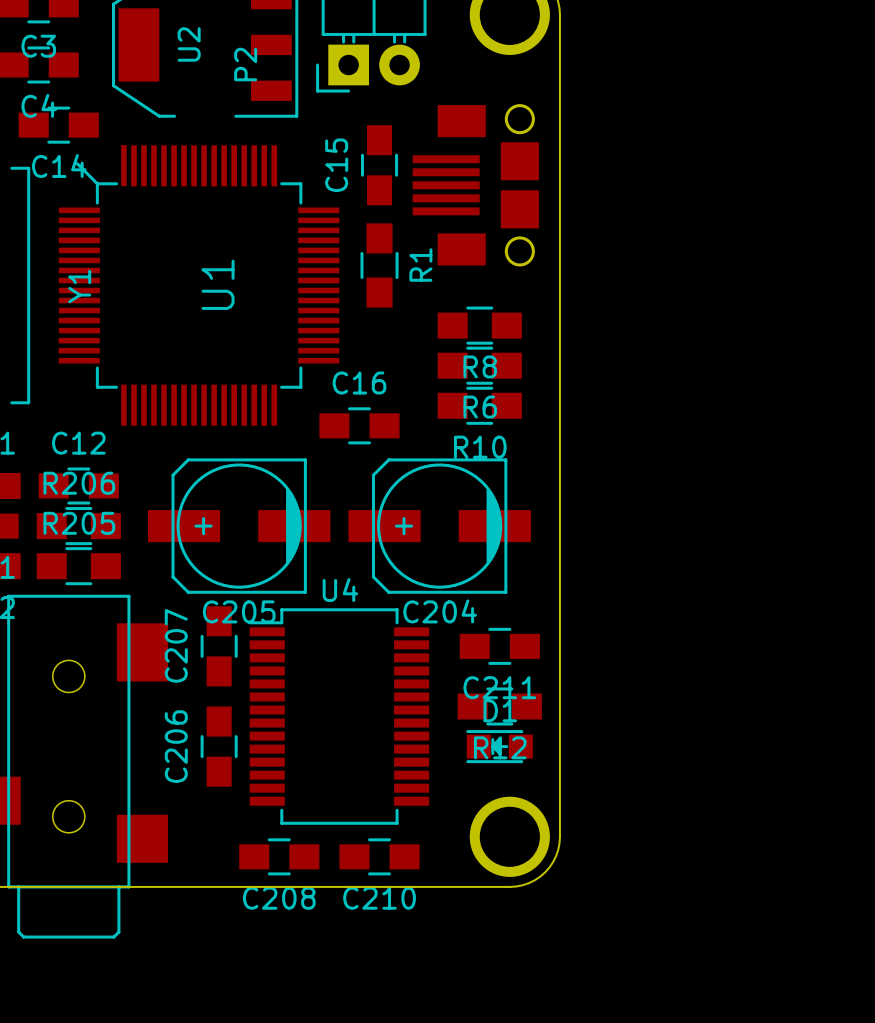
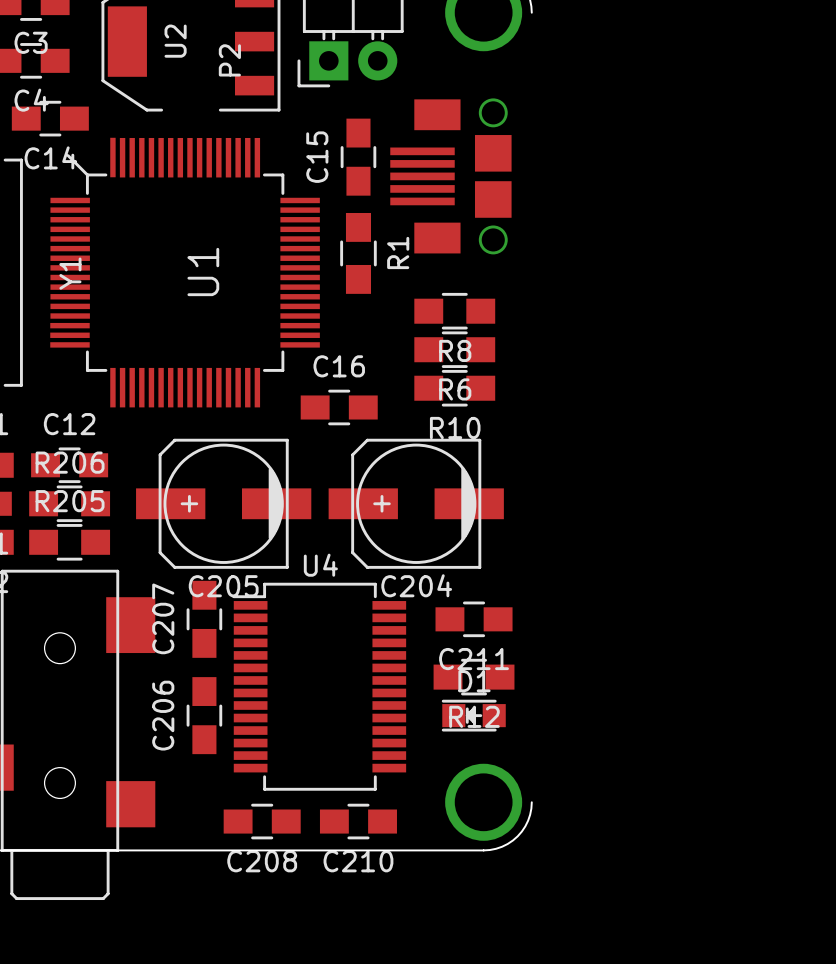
board edge: (559, 14) (559, 836) -> none

